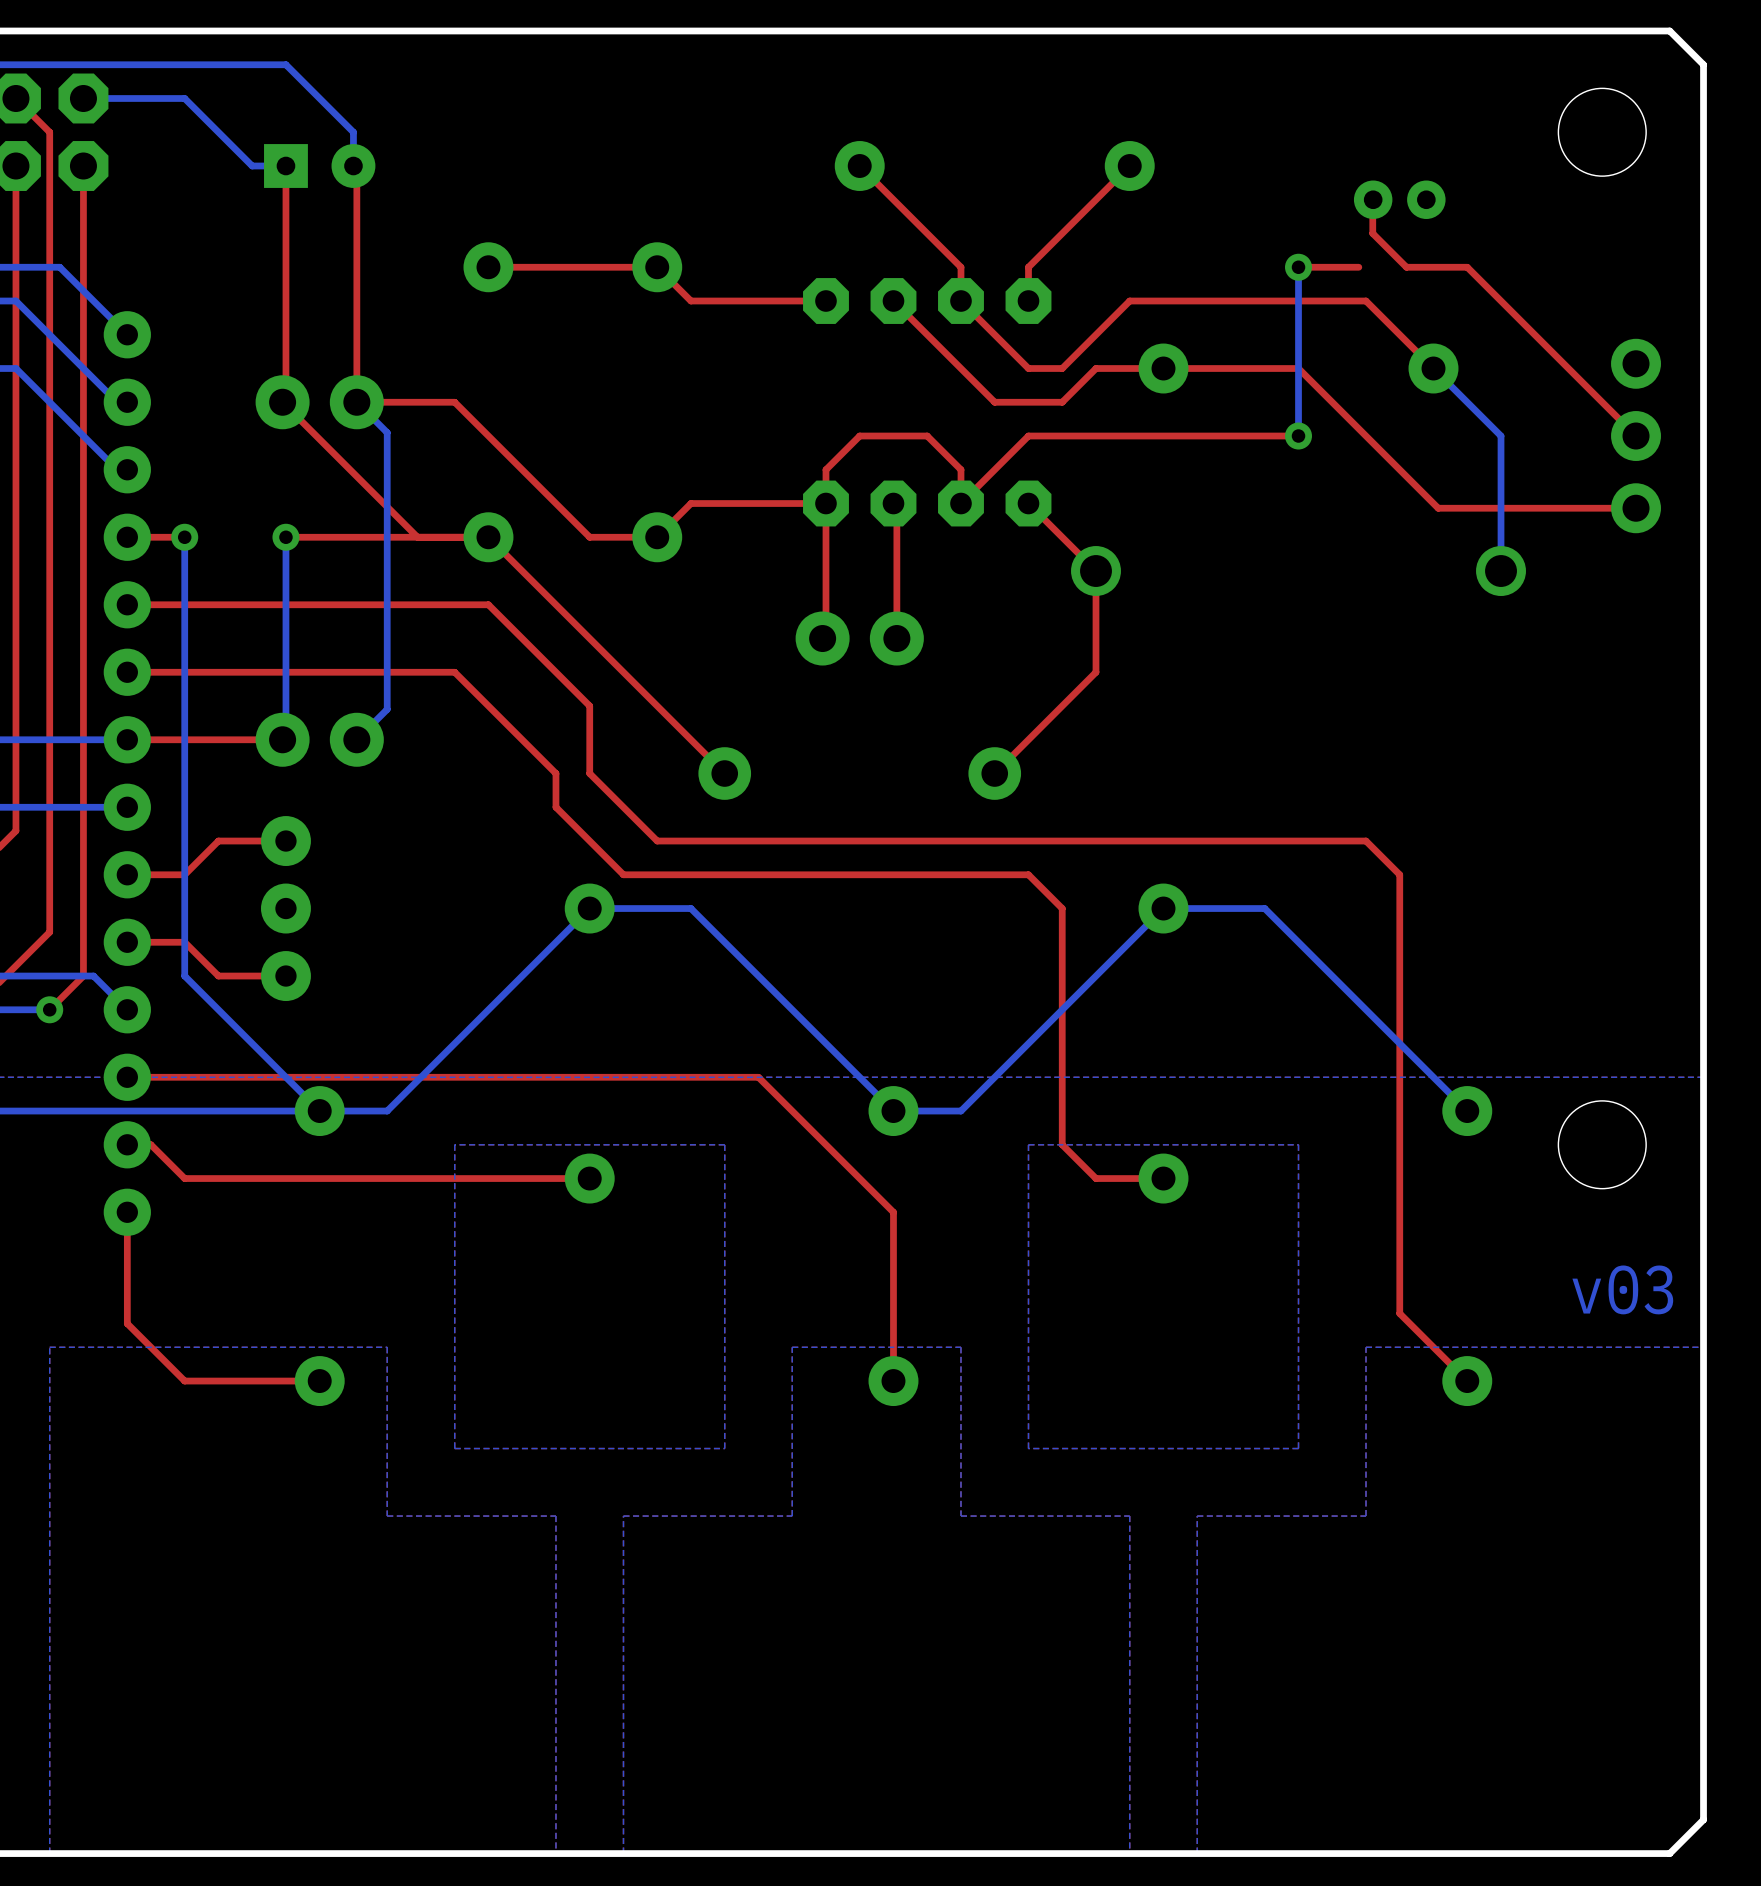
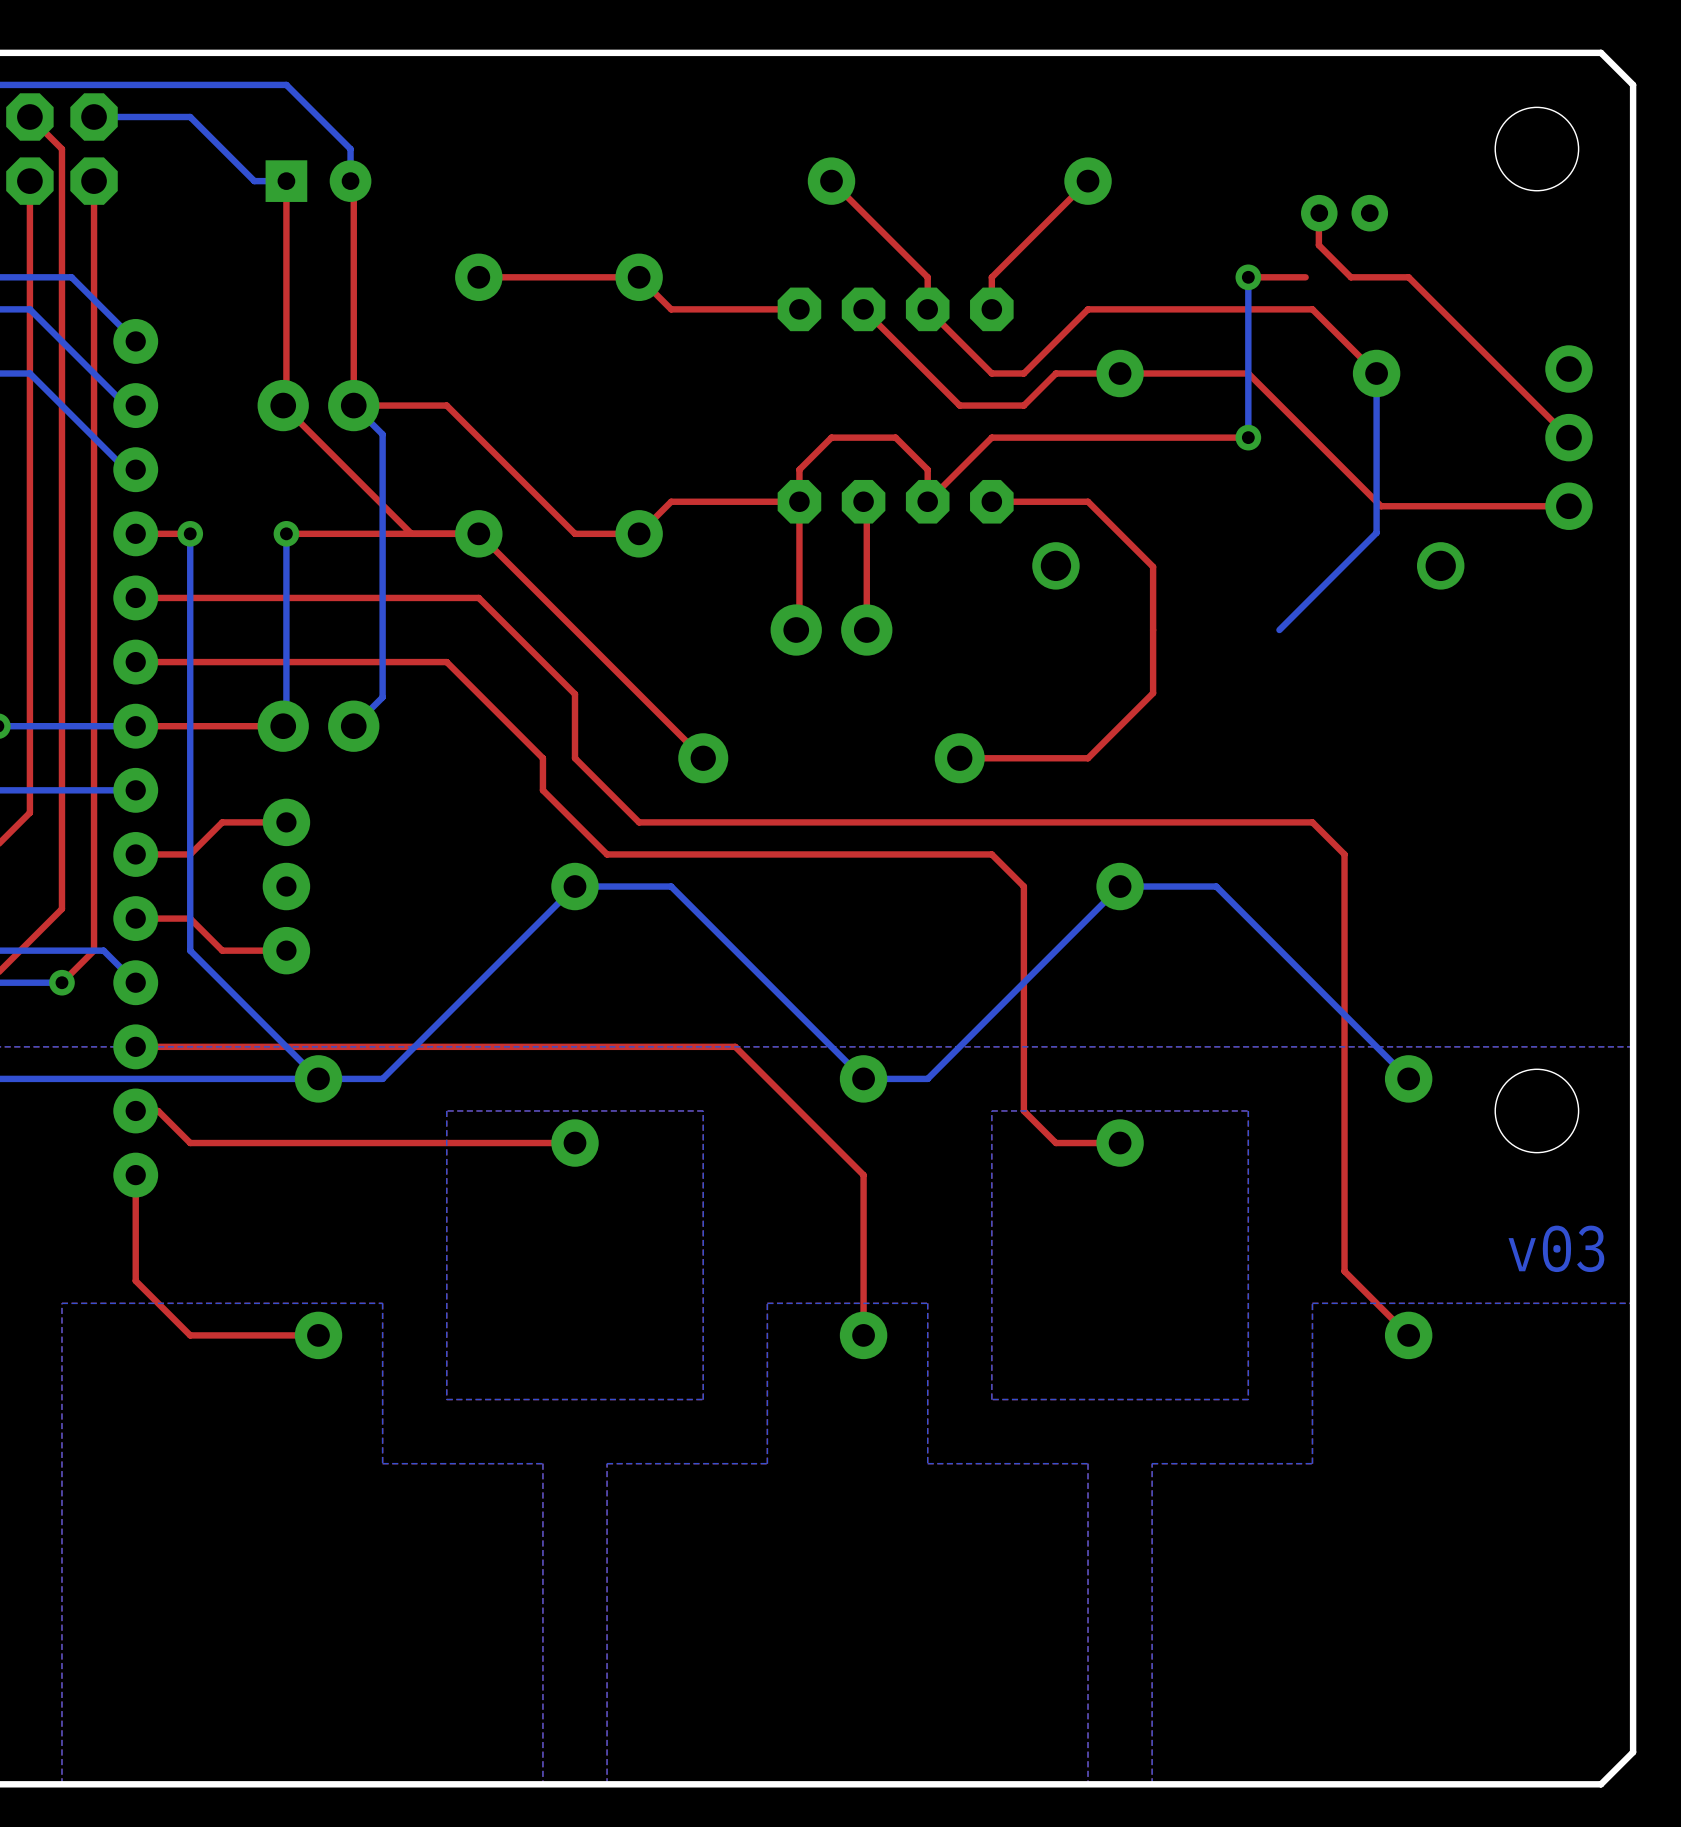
bottom track: (1433, 368) (1501, 436) (1501, 571) -> (1376, 373) (1376, 532) (1279, 630)
top track: (1028, 503) (1095, 571) (1095, 672) (994, 773) -> (991, 501) (1088, 501) (1153, 566) (1153, 693) (1088, 758) (959, 758)

